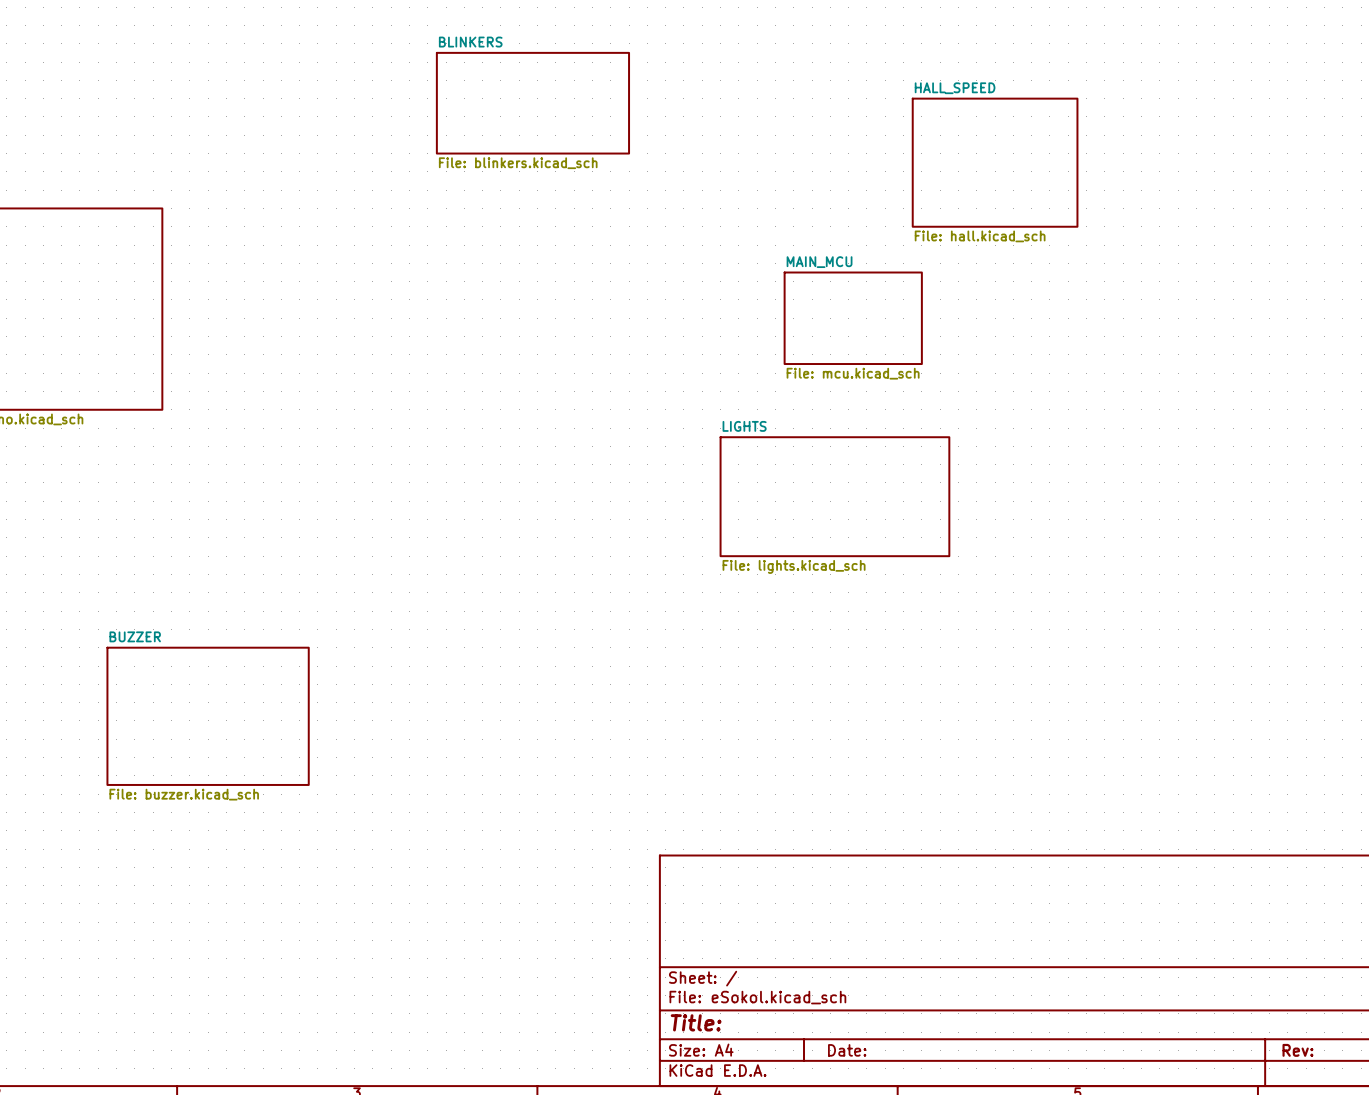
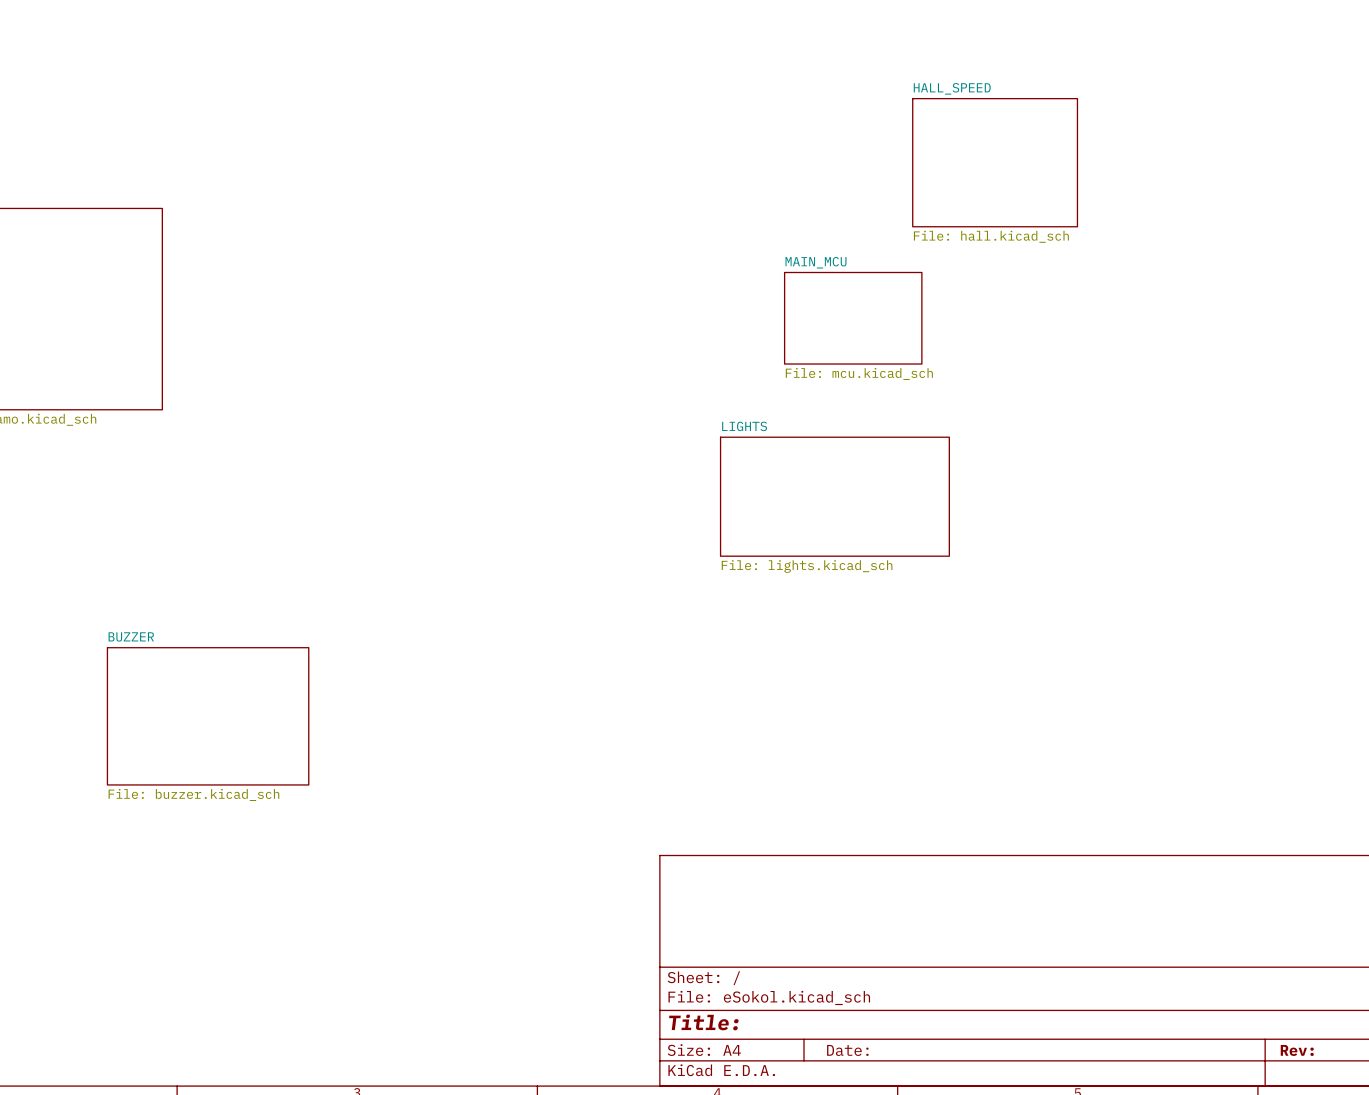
sheet BLINKERS: File: blinkers.kicad_sch (532, 103) -> none

